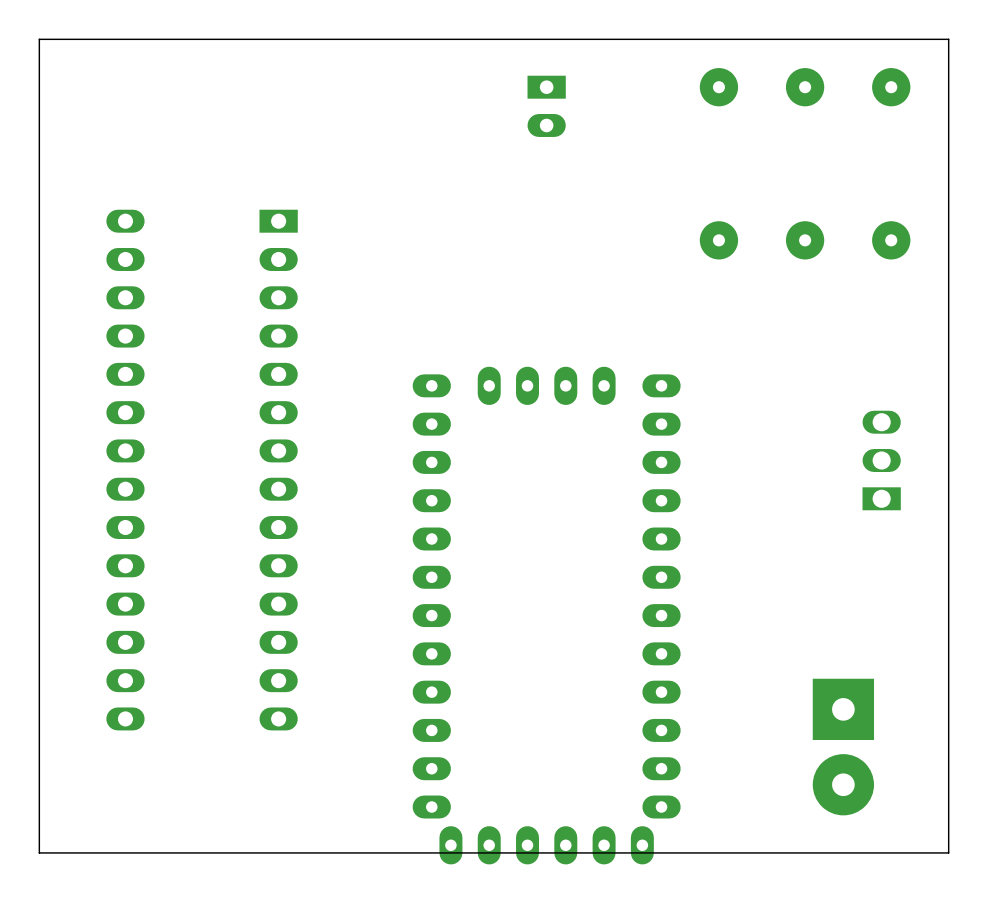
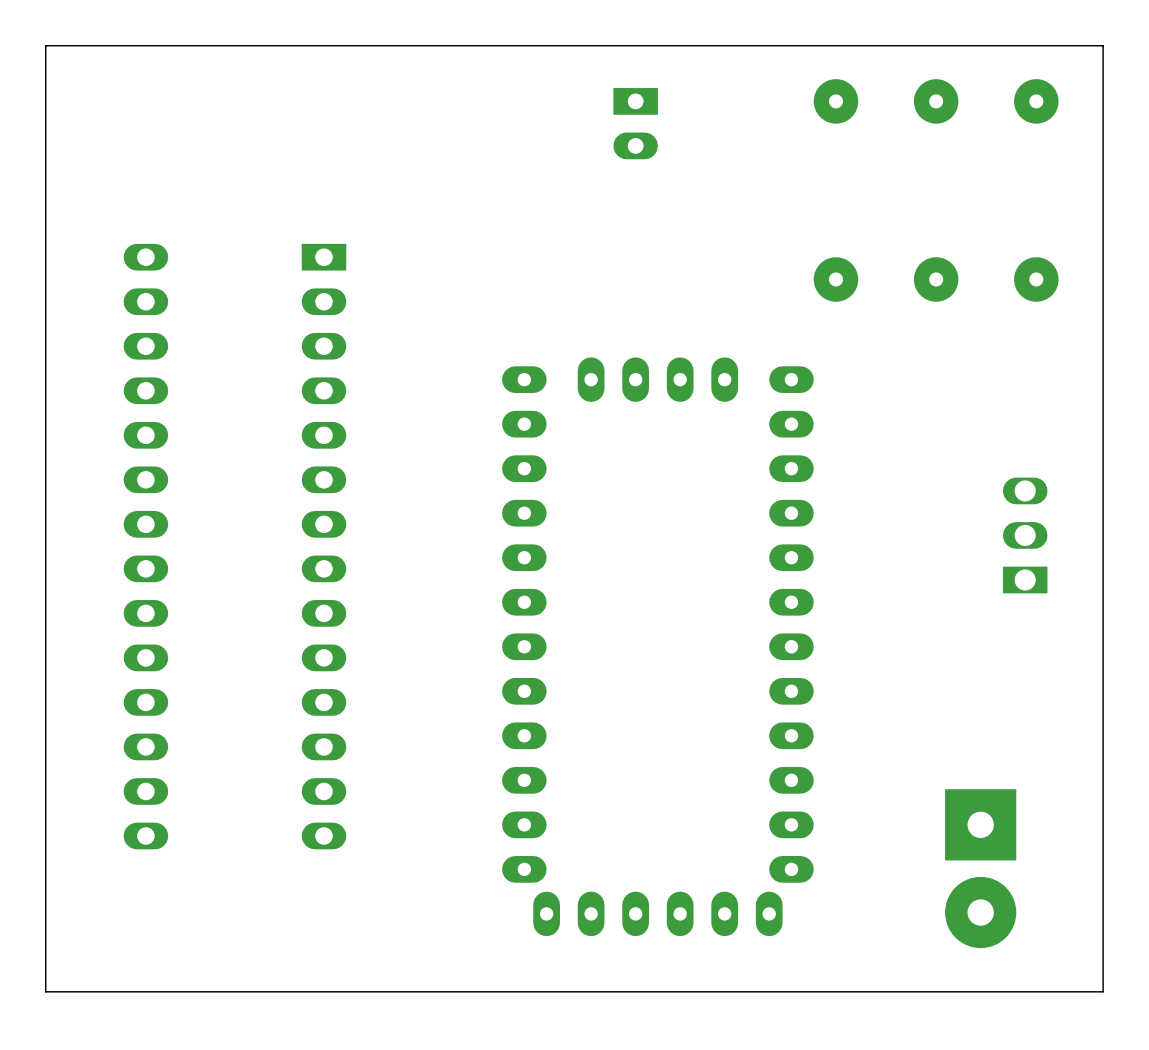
part position: (546, 615) -> (657, 646)

